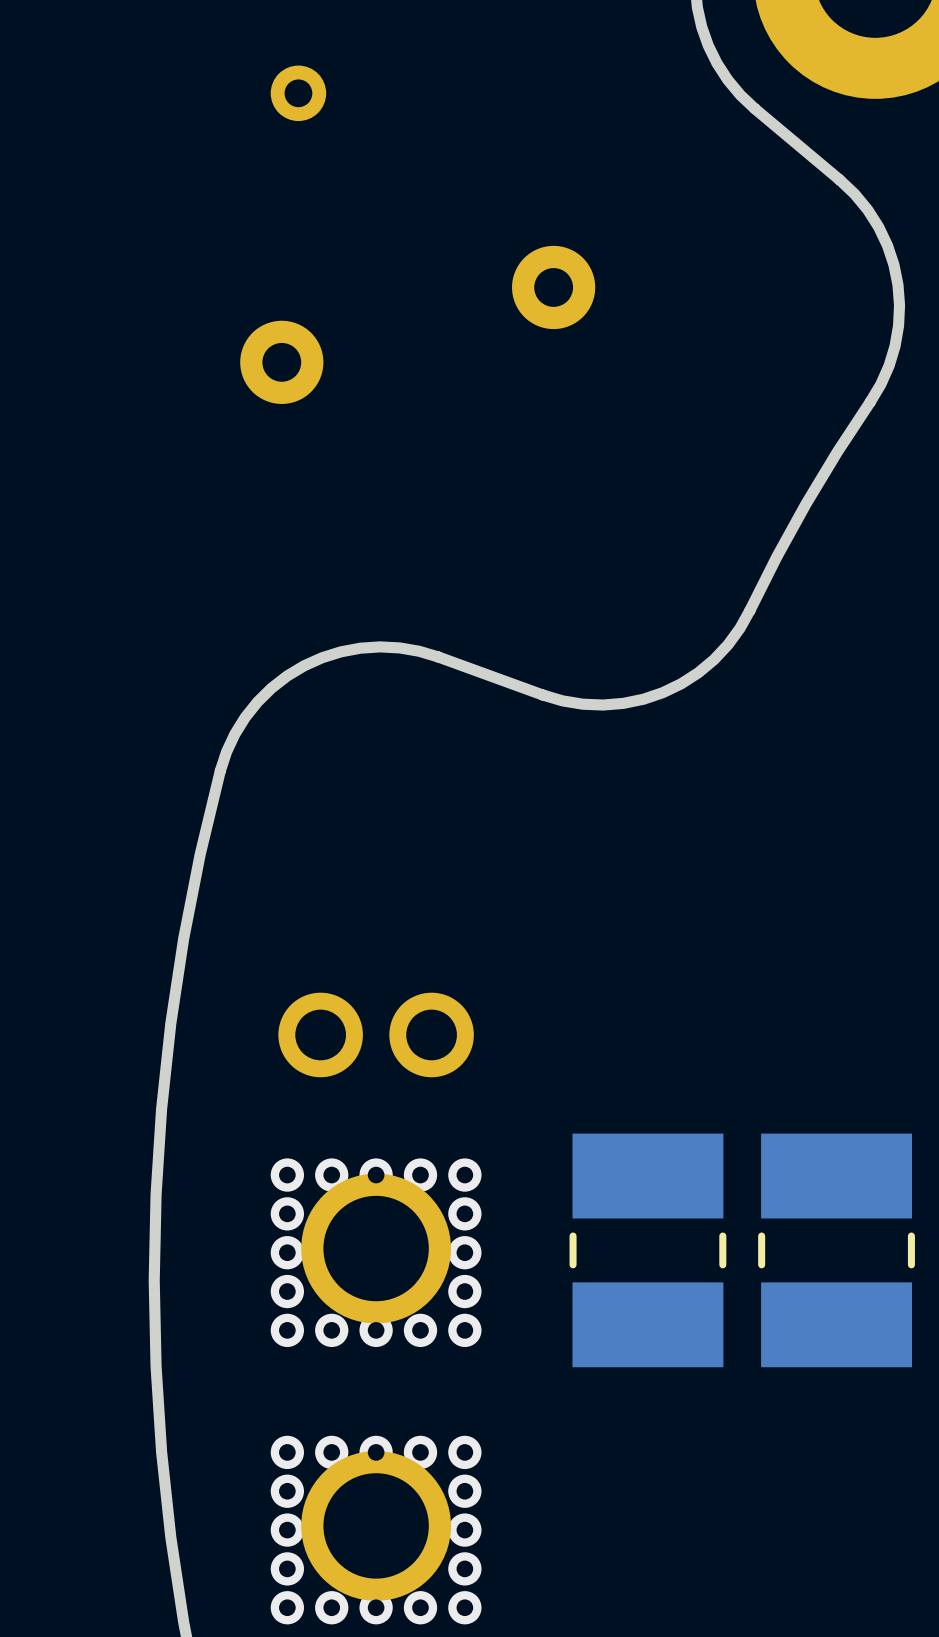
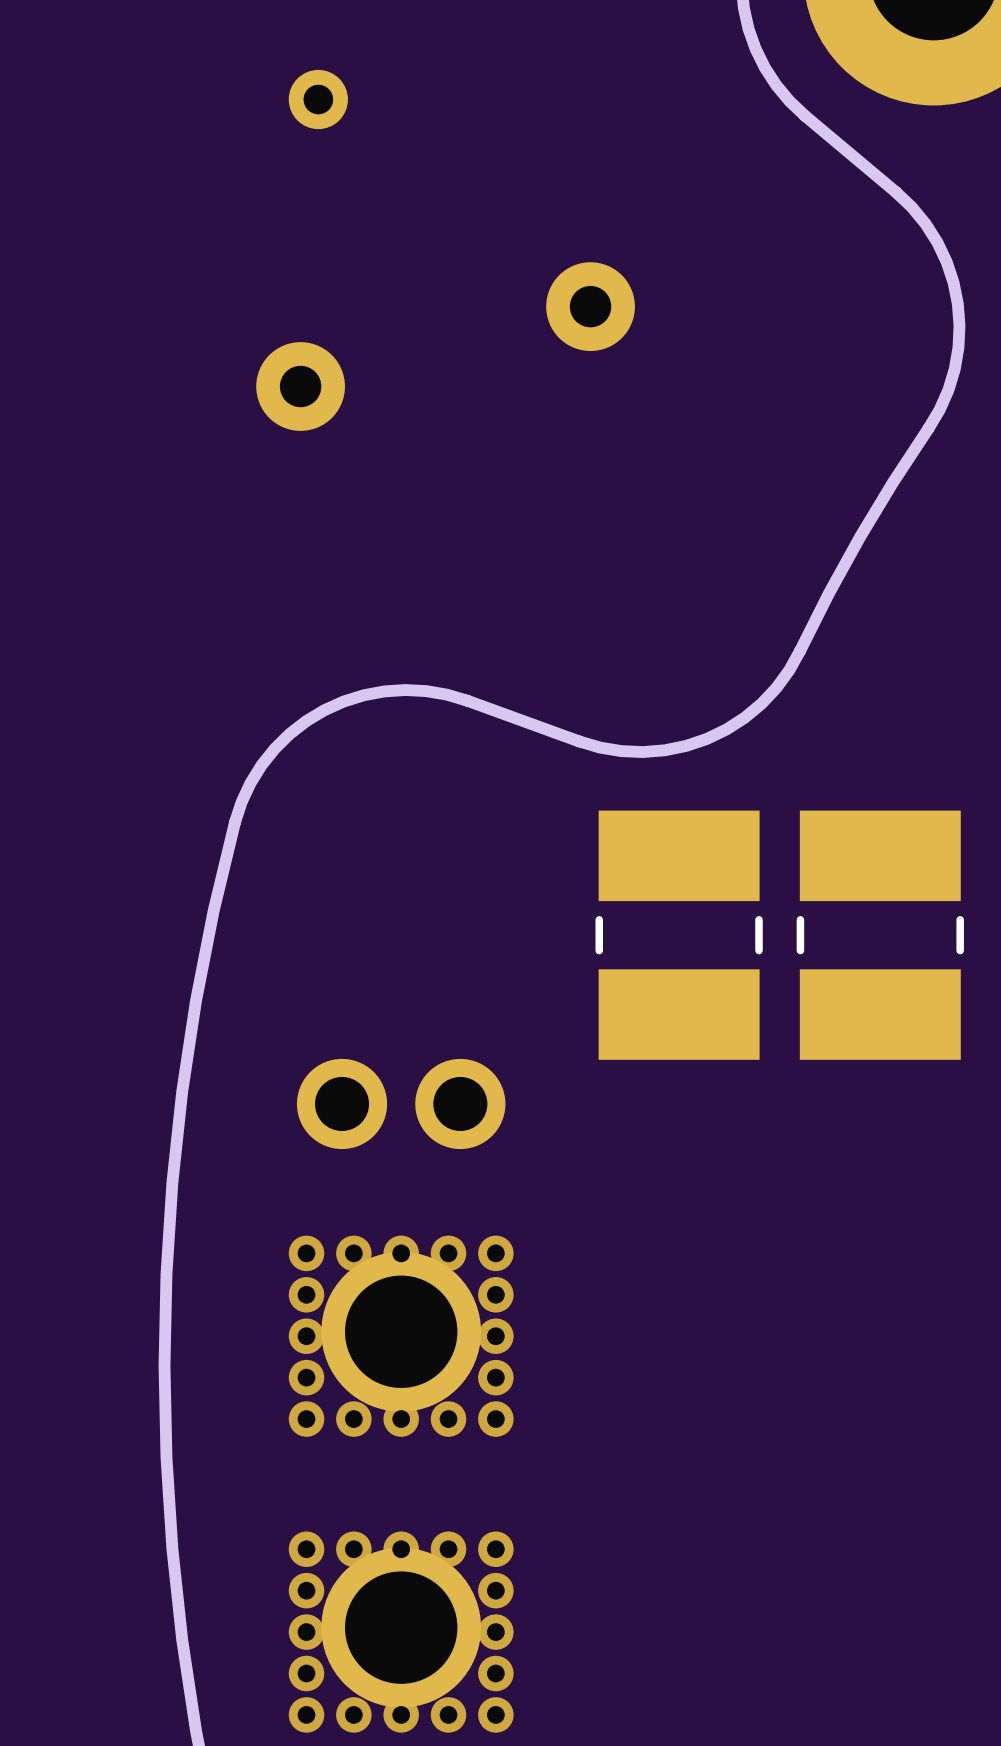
part: none -> (679, 935)
part: none -> (880, 935)
part: (647, 1250) -> none
part: (836, 1250) -> none

